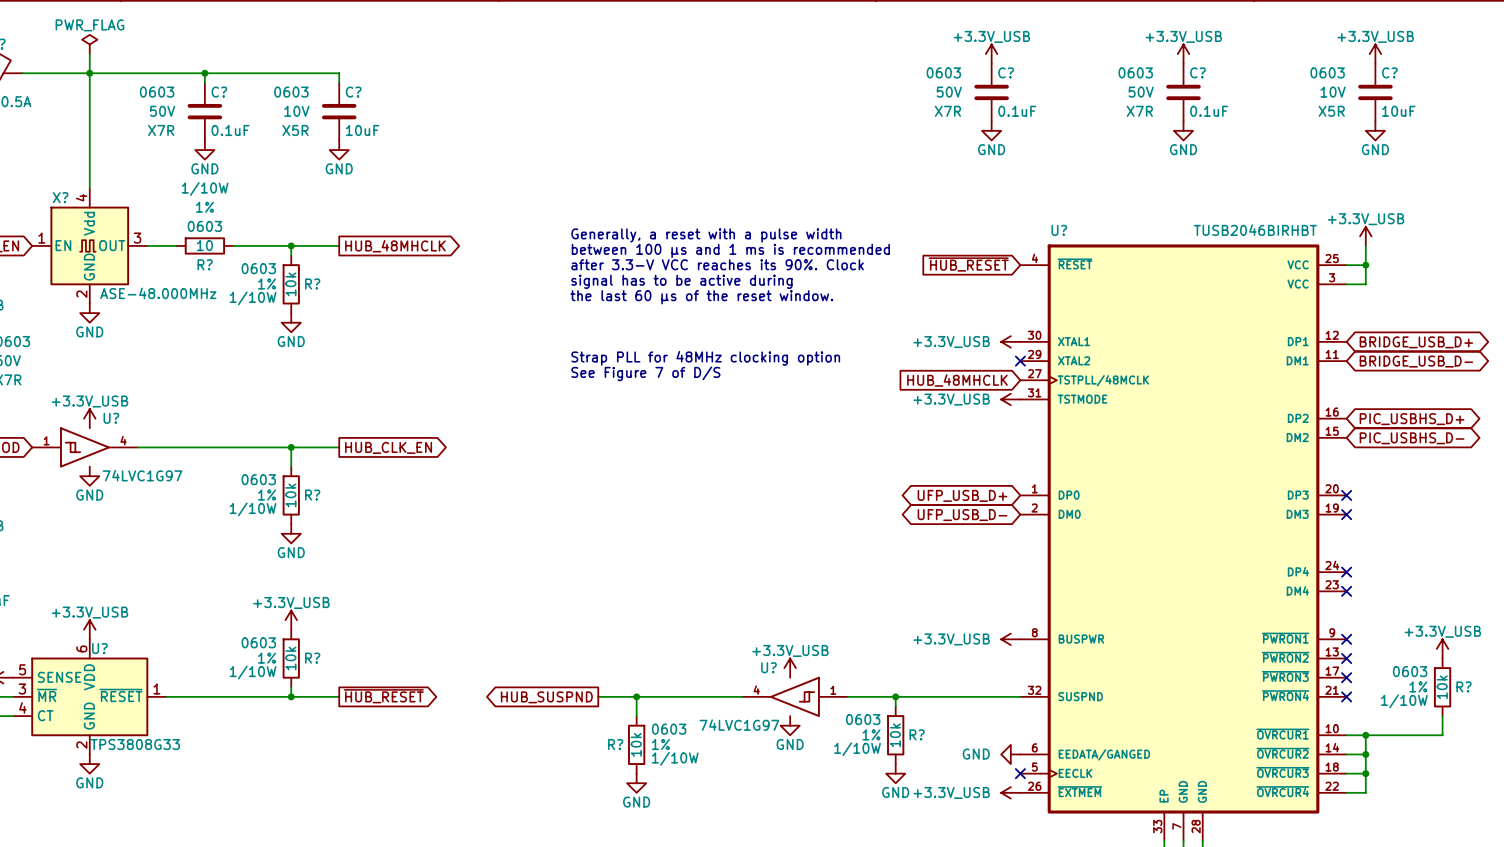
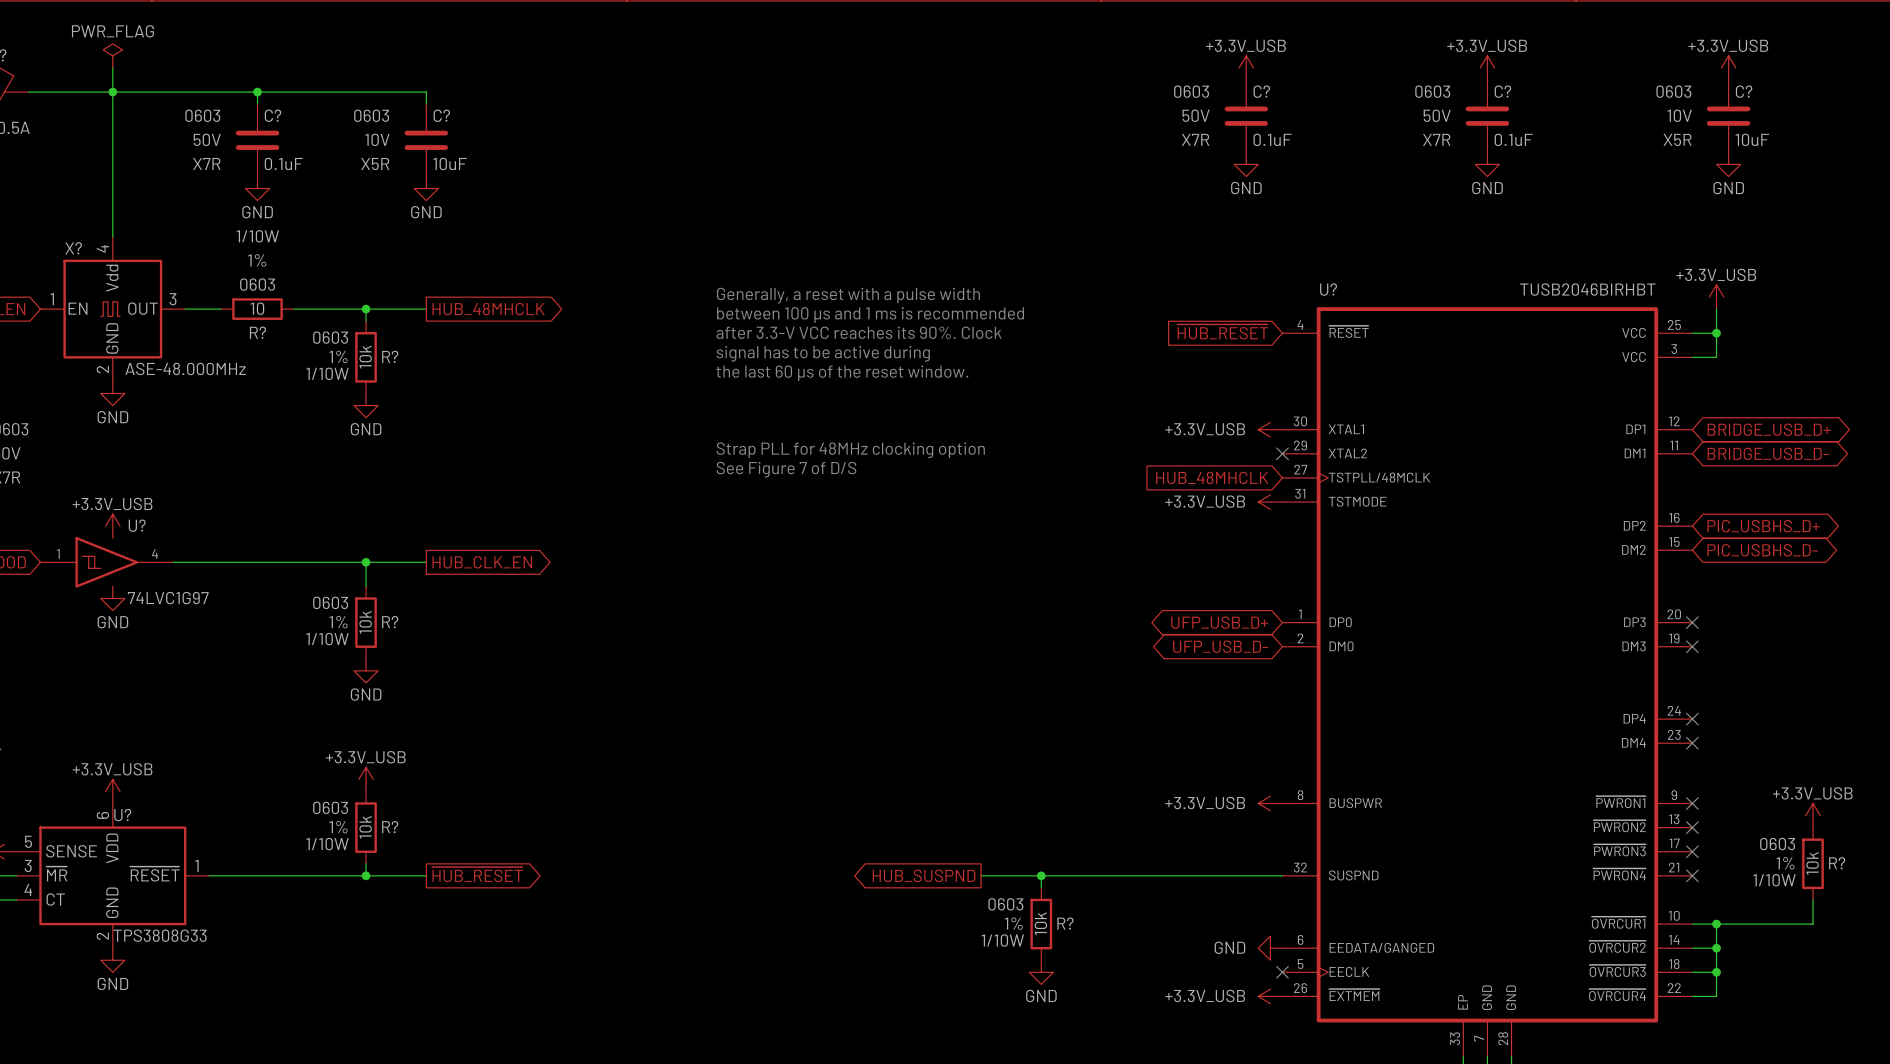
power symbol: +3.3V_USB (790, 668) -> none
wire: (598, 696) (742, 696) -> none
wire: (636, 696) (636, 716) -> none
junction: (636, 696) -> none
wire: none -> (981, 875) (1065, 875)
U?: 74LVC1G97 (794, 696) -> none
junction: none -> (1041, 875)
wire: (895, 696) (895, 706) -> (1041, 875) (1041, 887)
junction: (895, 696) -> none
global label position: HUB_SUSPND (546, 697) -> HUB_SUSPND (924, 875)
power symbol: GND (790, 725) -> none
R? position: (895, 735) -> (1041, 924)
R?: 10k (636, 744) -> none
power symbol: none -> GND (1041, 972)
power symbol: GND (895, 773) -> none
power symbol: GND (636, 783) -> none

